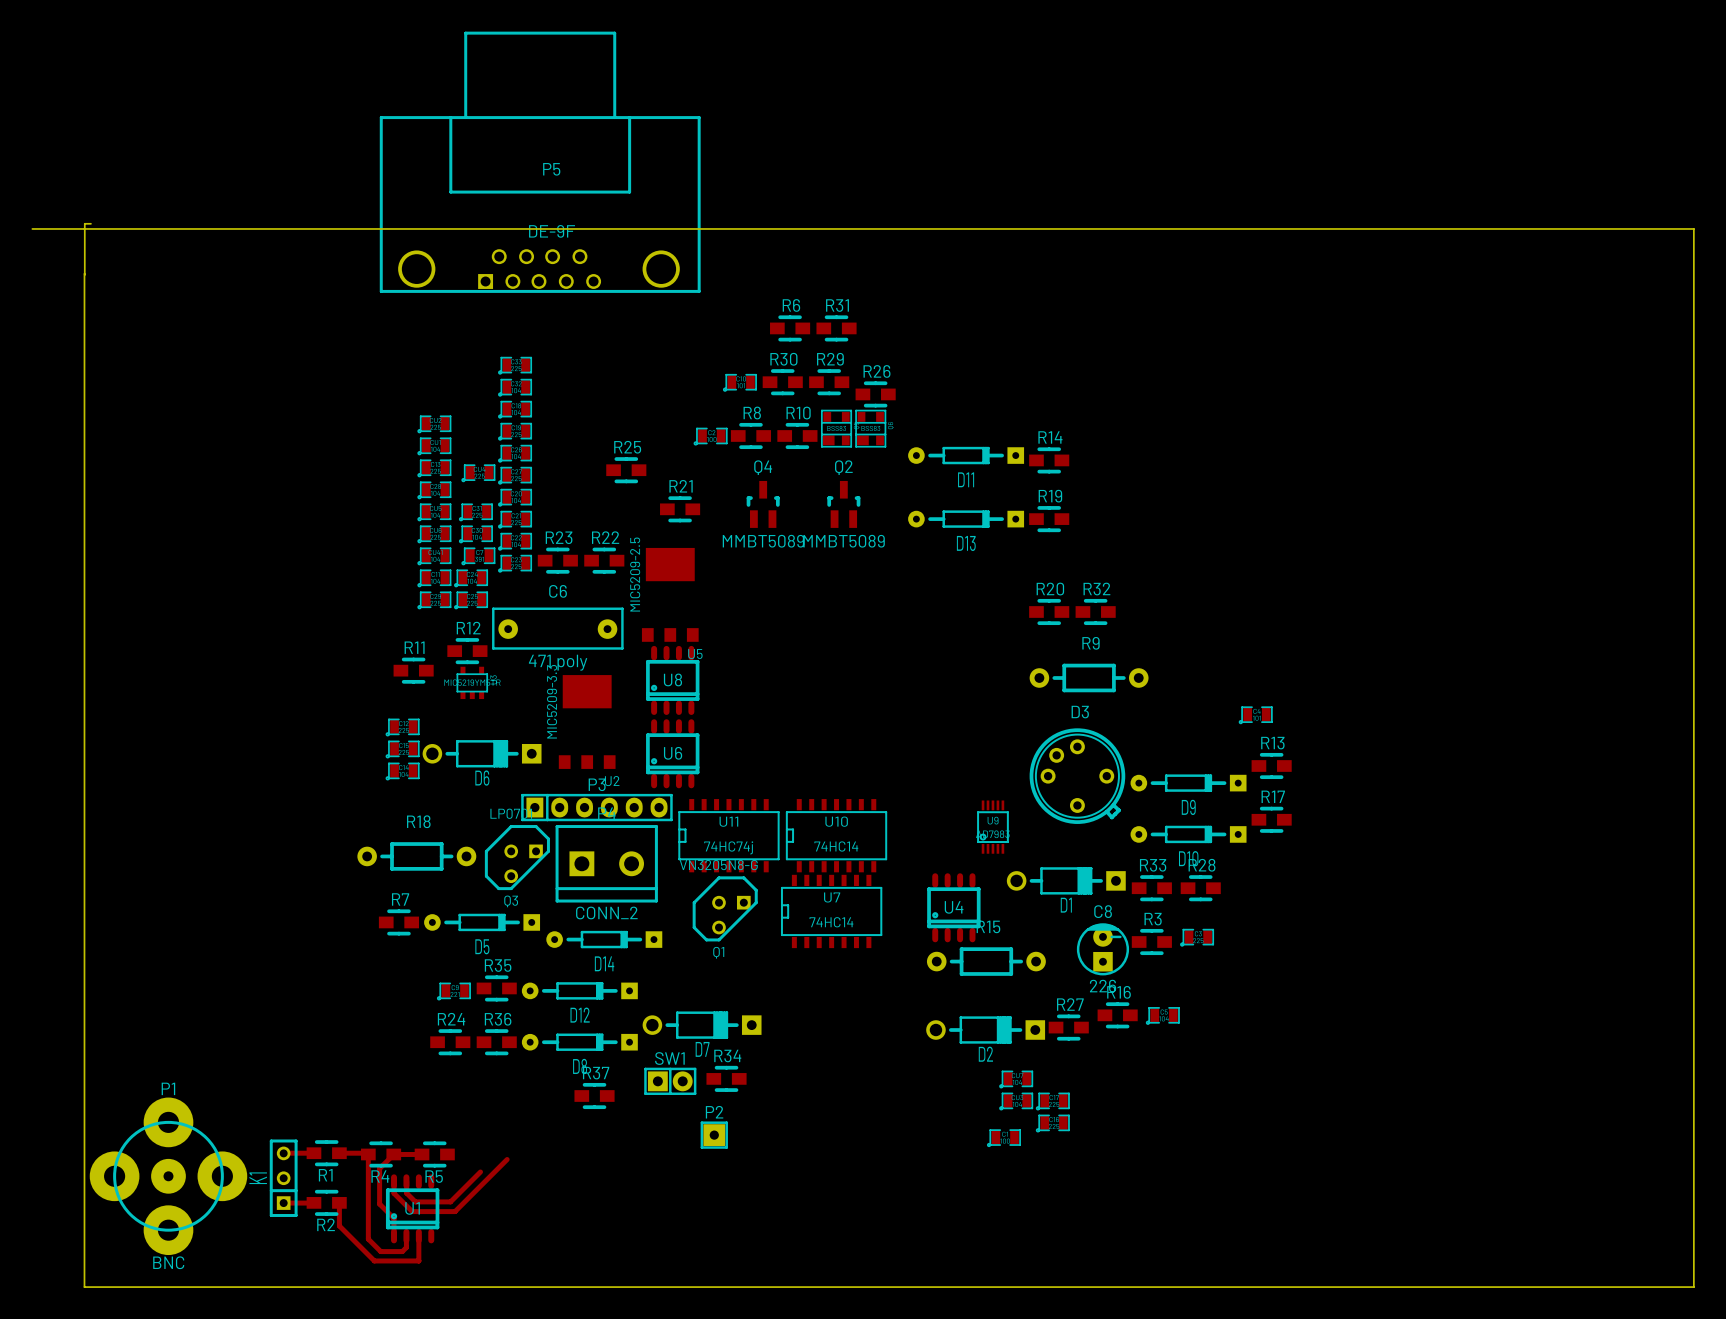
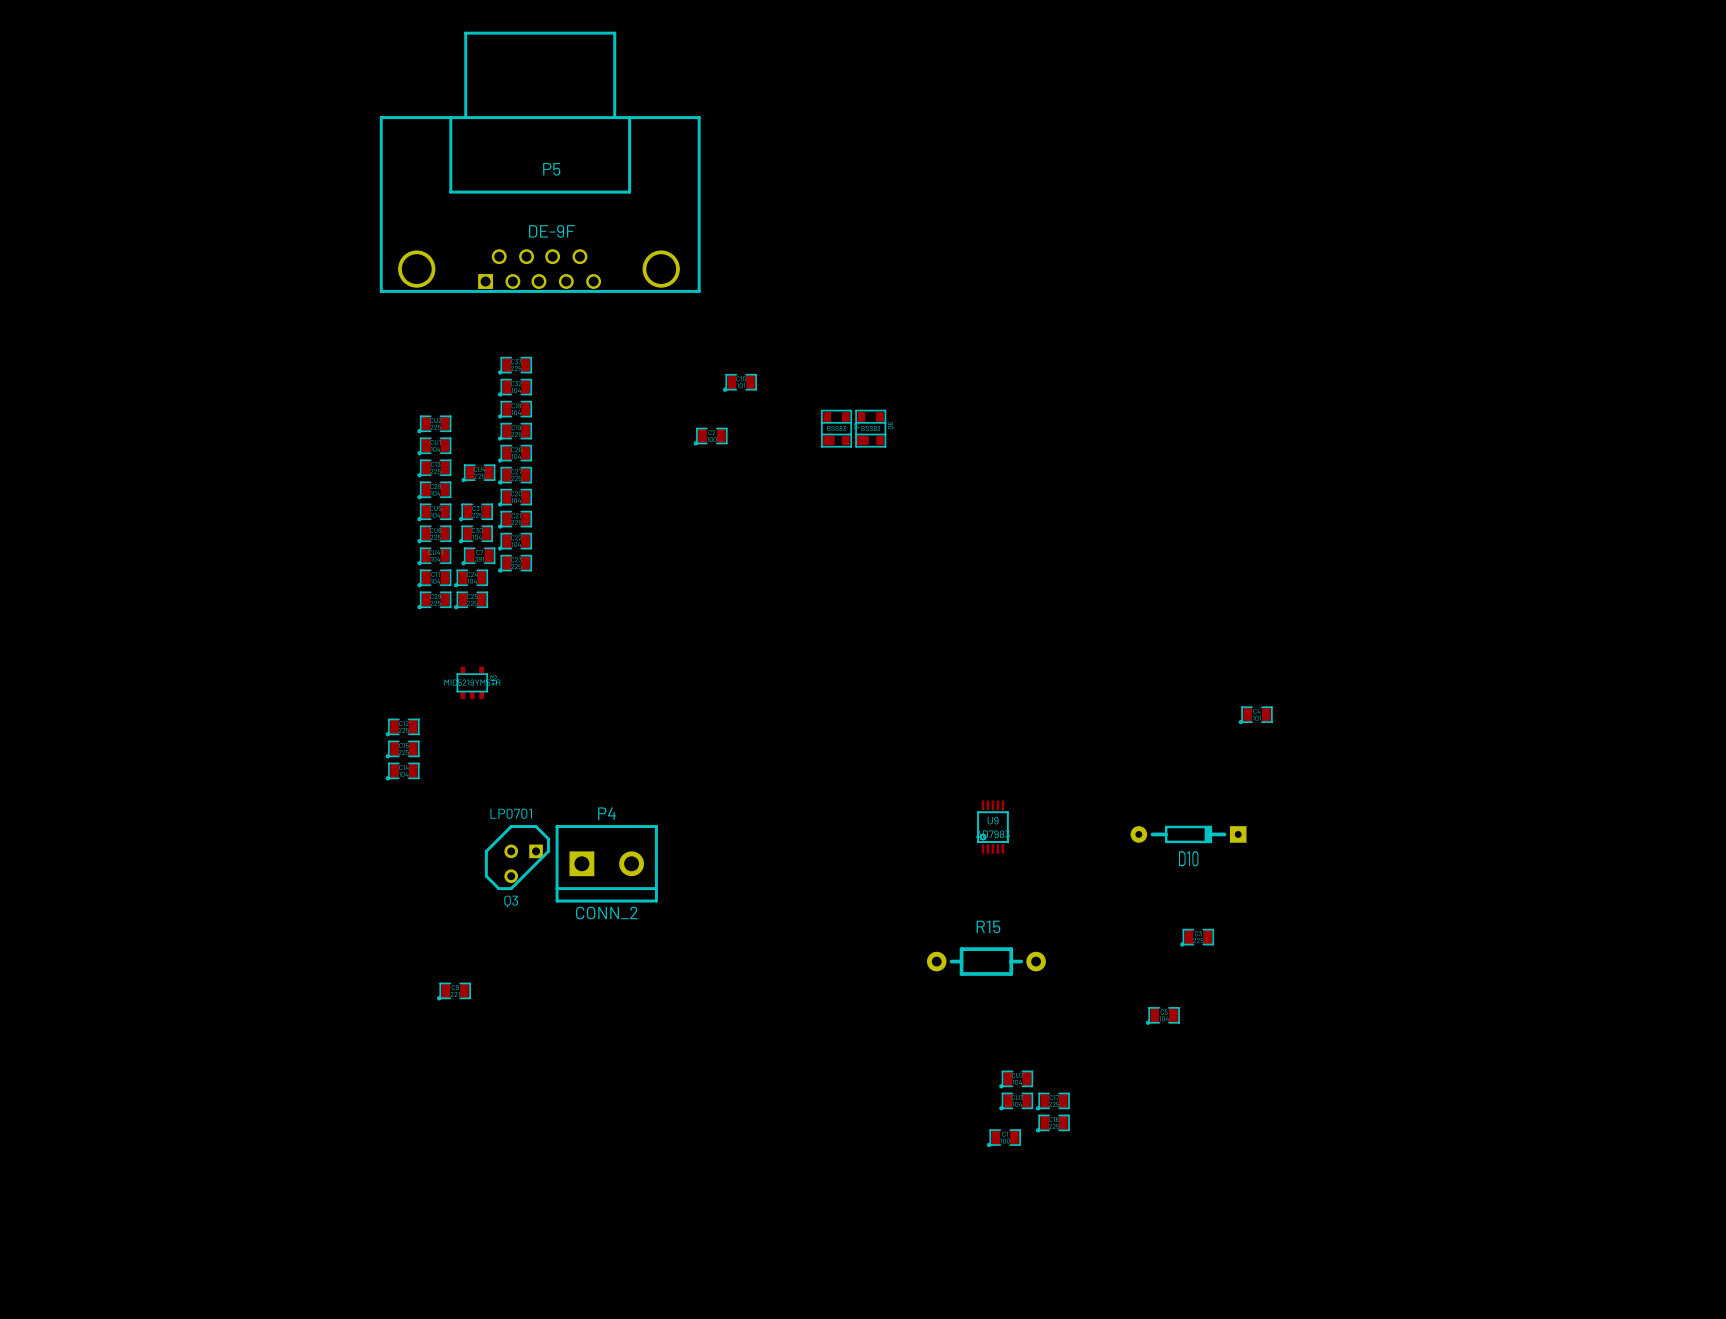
board edge: (90, 223) (84, 223) (84, 274) -> none
board edge: (32, 228) (1693, 228) (1693, 1287) (84, 1287) (84, 273) -> none
R6: (790, 328) -> none
R31: (836, 328) -> none
R30: (782, 382) -> none
R29: (829, 382) -> none
R26: (875, 394) -> none
R8: (750, 435) -> none
R10: (797, 435) -> none
D11: (966, 455) -> none
R14: (1049, 460) -> none
R25: (626, 470) -> none
Q4: MMBT5089 (763, 504) -> none
Q2: MMBT5089 (843, 504) -> none
R21: (680, 509) -> none
D13: (966, 519) -> none
R19: (1049, 519) -> none
R23: (557, 560) -> none
R22: (604, 560) -> none
U5: MIC5209-2.5 (670, 594) -> none
R20: (1049, 611) -> none
R32: (1095, 611) -> none
C6: 471 poly (557, 628) -> none
R12: (467, 651) -> none
R11: (413, 670) -> none
R9: (1089, 677) -> none
U8: (672, 680) -> none
U2: MIC5209-3.3 (587, 722) -> none
D6: (482, 753) -> none
U6: (672, 753) -> none
R13: (1271, 766) -> none
D3: (1077, 776) -> none
D9: (1188, 783) -> none
P3: (596, 807) -> none
R17: (1271, 819) -> none
U11: 74HC74j (728, 835) -> none
U10: 74HC14 (836, 835) -> none
R18: (416, 856) -> none
D1: (1066, 880) -> none
R33: (1151, 888) -> none
R28: (1200, 888) -> none
U4: (953, 907) -> none
Q1: VN3205N8-G (725, 908) -> none
U7: 74HC14 (831, 911) -> none
R7: (398, 922) -> none
D5: (482, 922) -> none
D14: (604, 939) -> none
R3: (1151, 942) -> none
C8: 226 (1102, 949) -> none
R35: (496, 988) -> none
D12: (579, 990) -> none
R16: (1117, 1015) -> none
D7: (702, 1025) -> none
R27: (1068, 1027) -> none
D2: (985, 1030) -> none
R24: (450, 1042) -> none
R36: (496, 1042) -> none
D8: (579, 1042) -> none
R34: (726, 1078) -> none
SW1: (670, 1081) -> none
R37: (594, 1096) -> none
P2: (714, 1135) -> none
top track: (313, 1153) (283, 1153) -> none
R1: (326, 1153) -> none
top track: (339, 1153) (368, 1154) (368, 1239) (380, 1251) (402, 1251) (406, 1247) (406, 1236) -> none
R4: (381, 1154) -> none
top track: (422, 1154) (393, 1154) (379, 1168) (379, 1204) (394, 1218) (394, 1236) -> none
R5: (434, 1154) -> none
top track: (507, 1159) (455, 1211) (412, 1211) (394, 1193) (394, 1181) -> none
top track: (480, 1171) (450, 1201) (415, 1201) (406, 1193) (406, 1181) -> none
P1: BNC (168, 1176) -> none
K1: (283, 1178) -> none
top track: (313, 1202) (283, 1203) -> none
R2: (326, 1202) -> none
top track: (339, 1202) (339, 1225) (374, 1260) (418, 1260) (418, 1236) -> none
U1: (412, 1208) -> none

